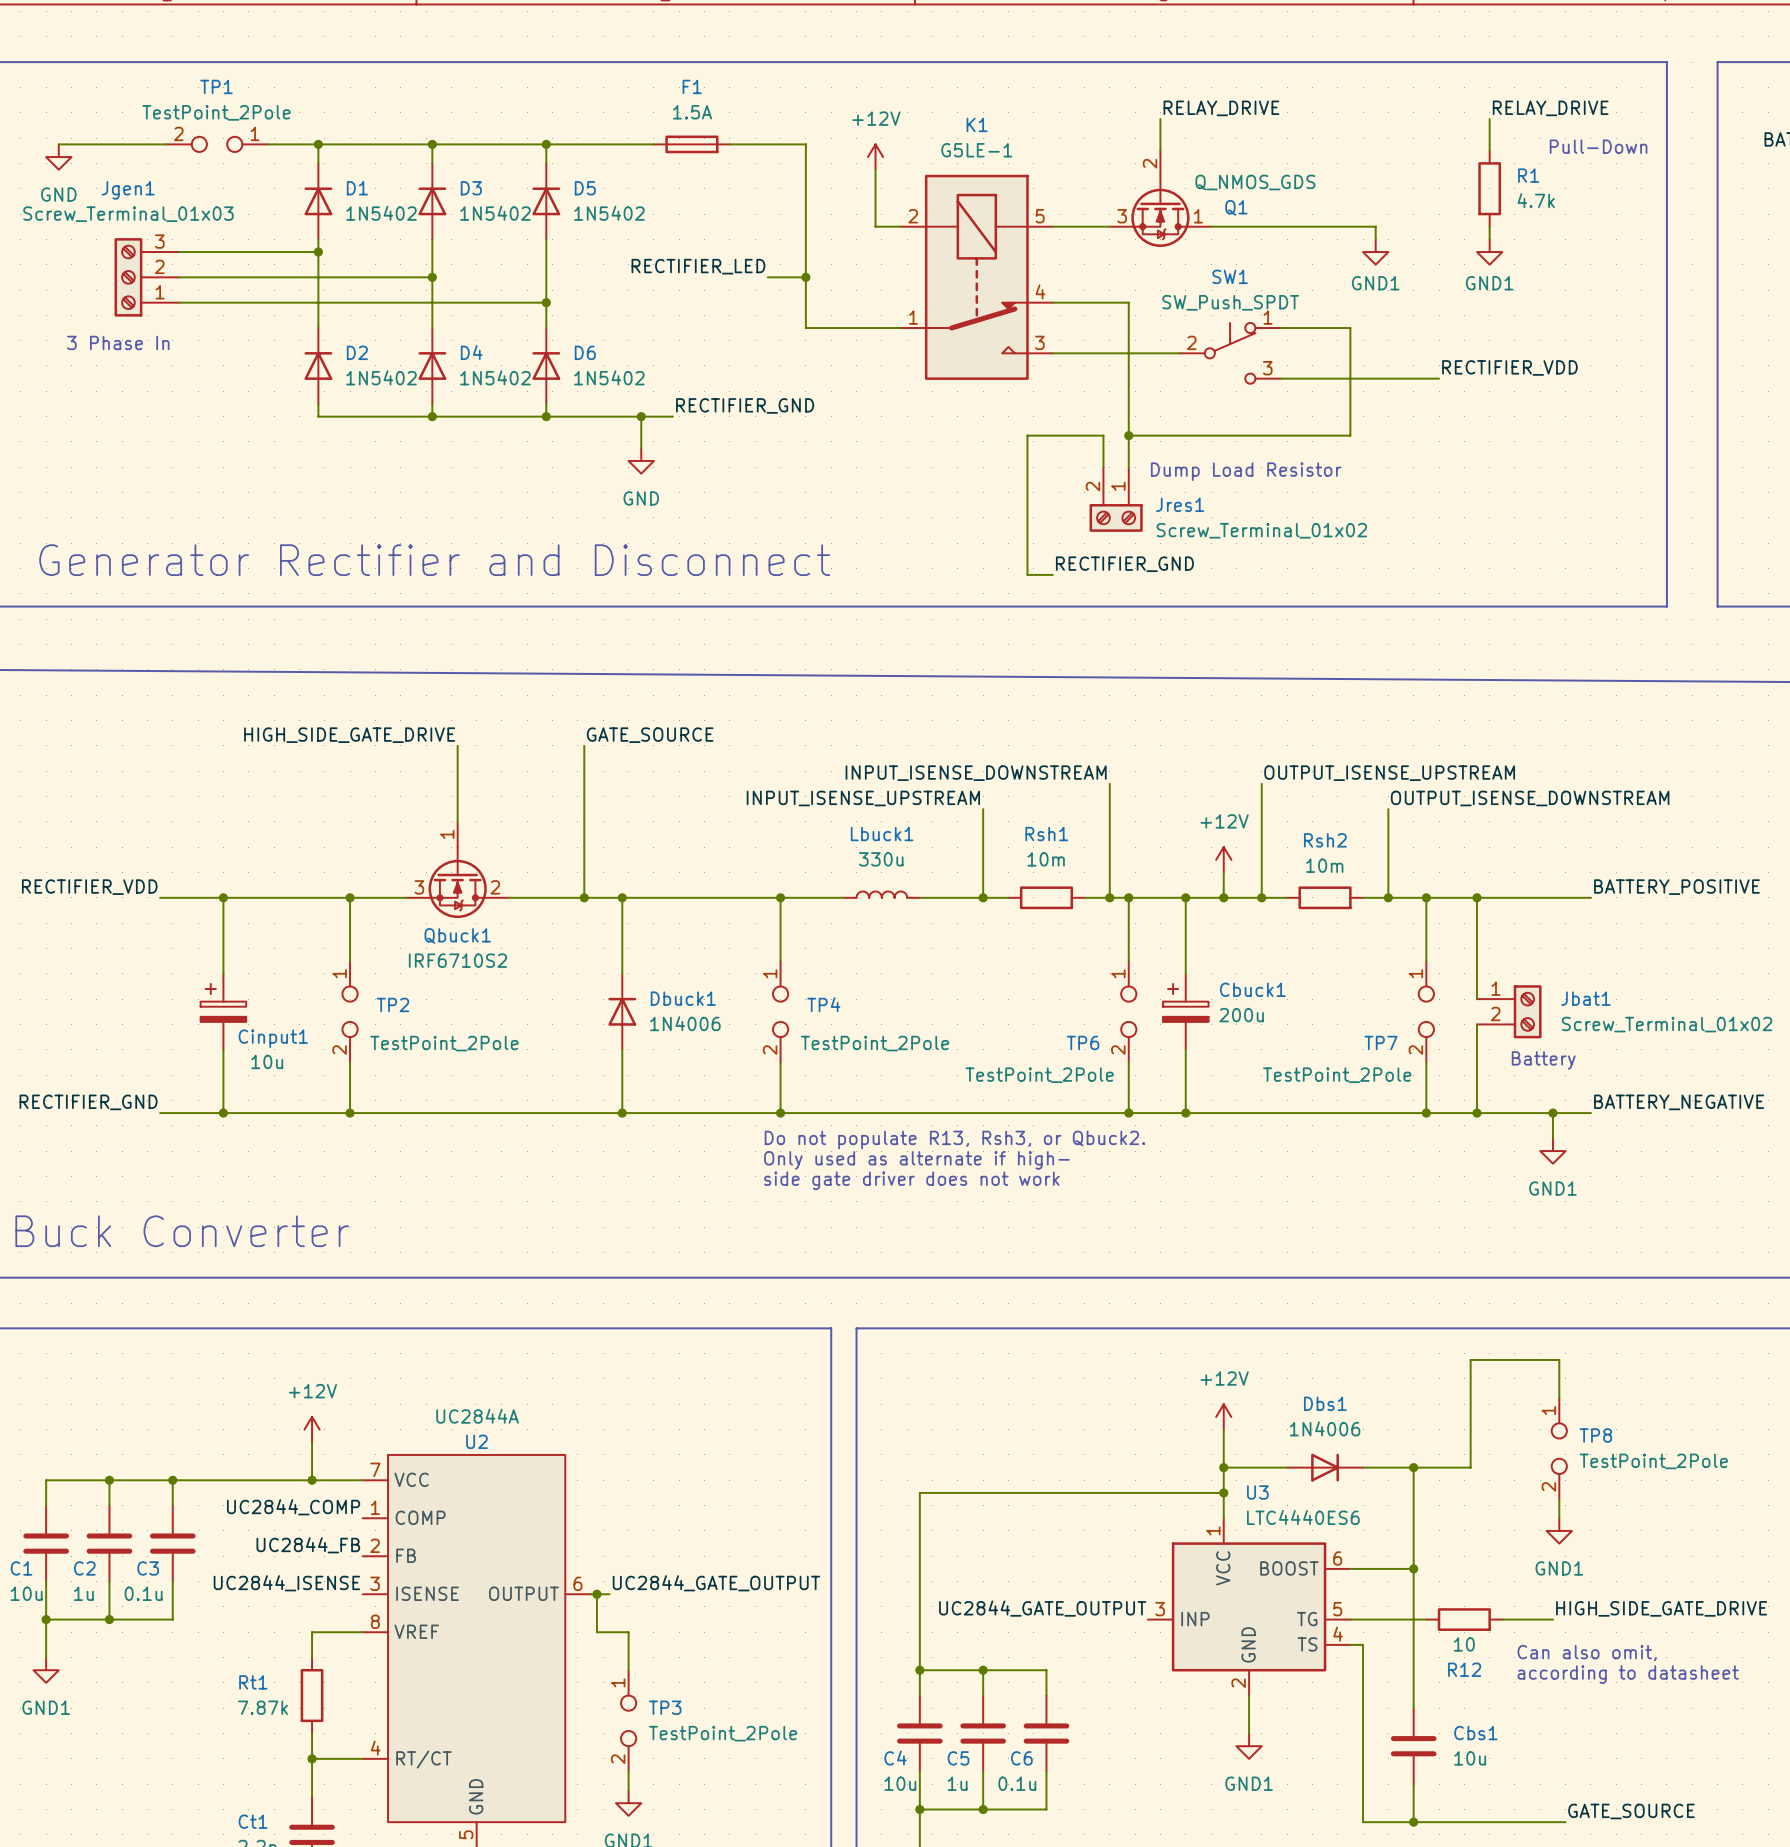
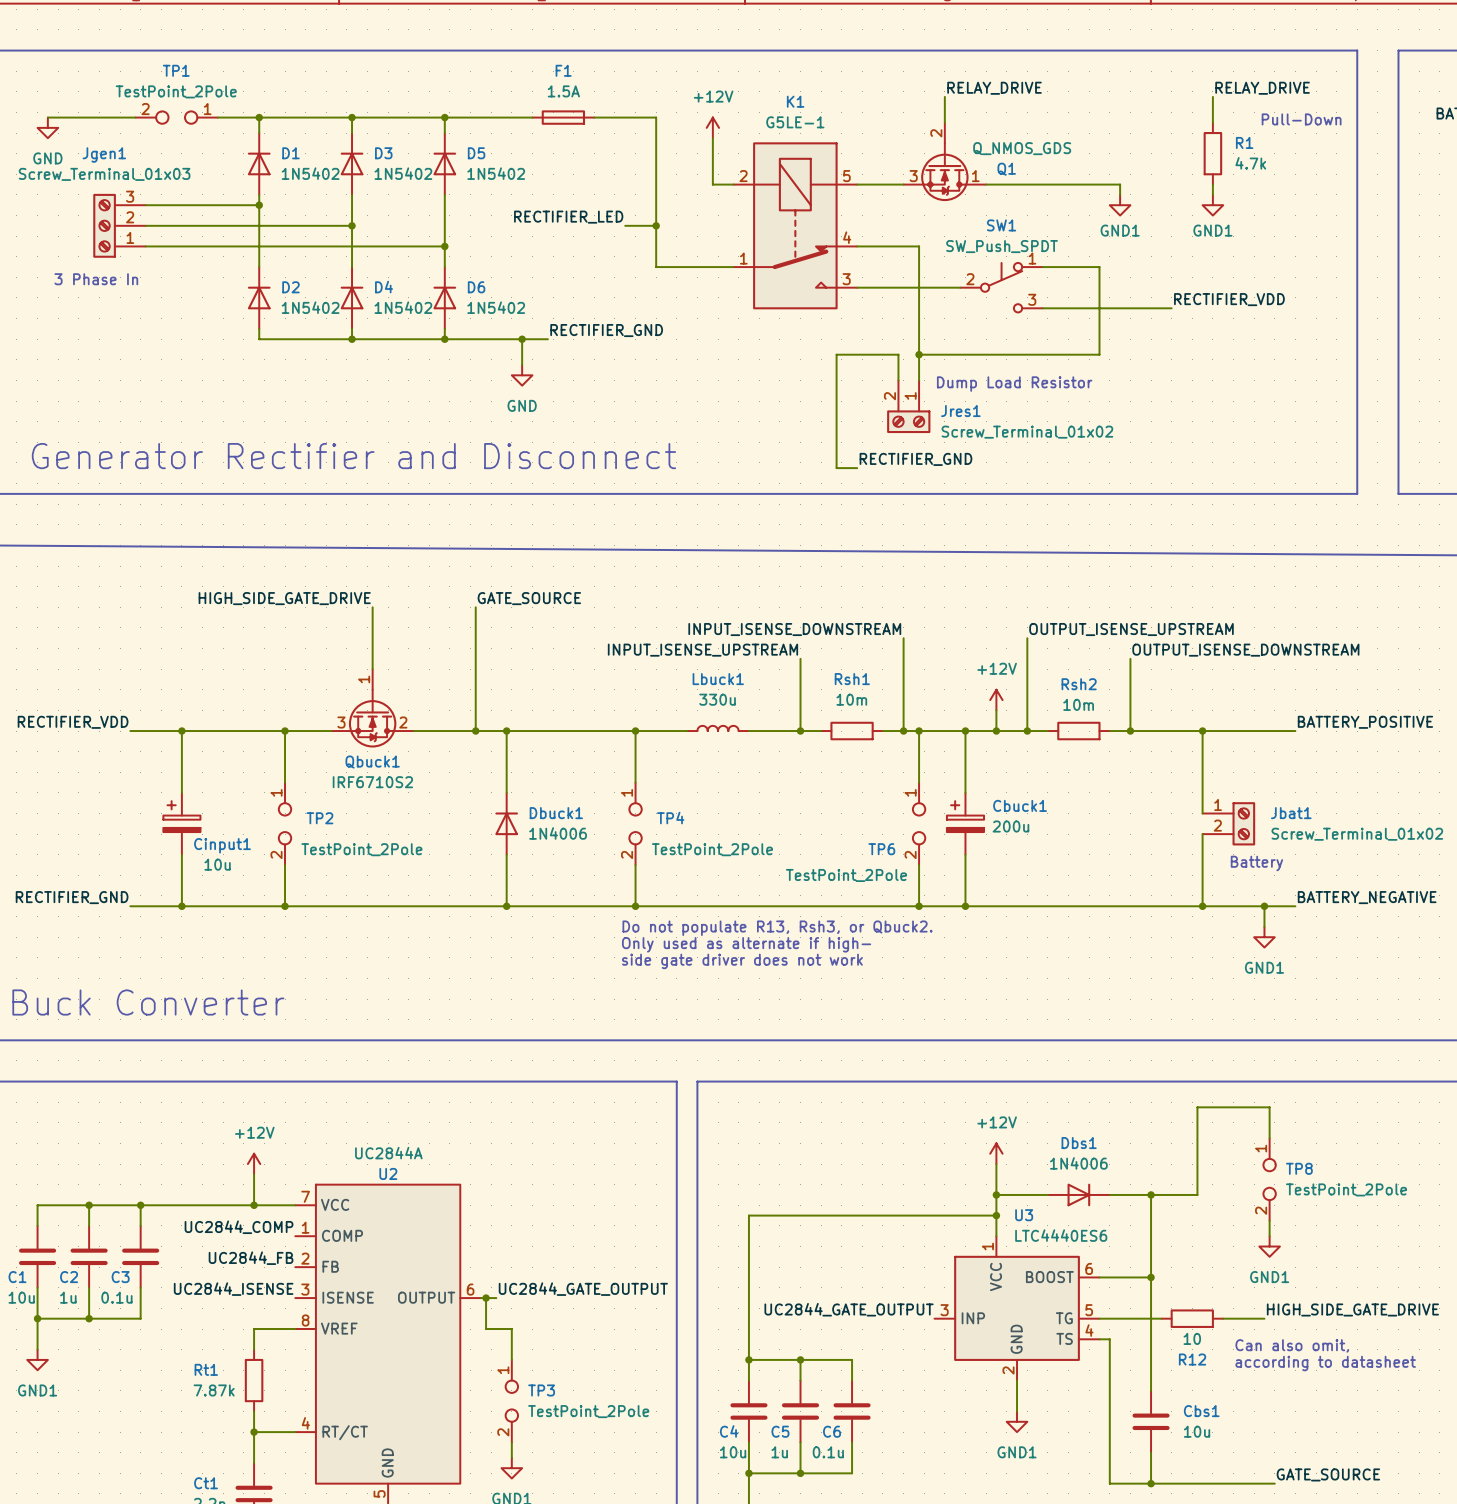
wire: (1426, 897) (1426, 961) -> none
junction: (1426, 897) -> none
TP7: TestPoint_2Pole (1426, 1011) -> none
wire: (1426, 1062) (1426, 1113) -> none
junction: (1426, 1113) -> none

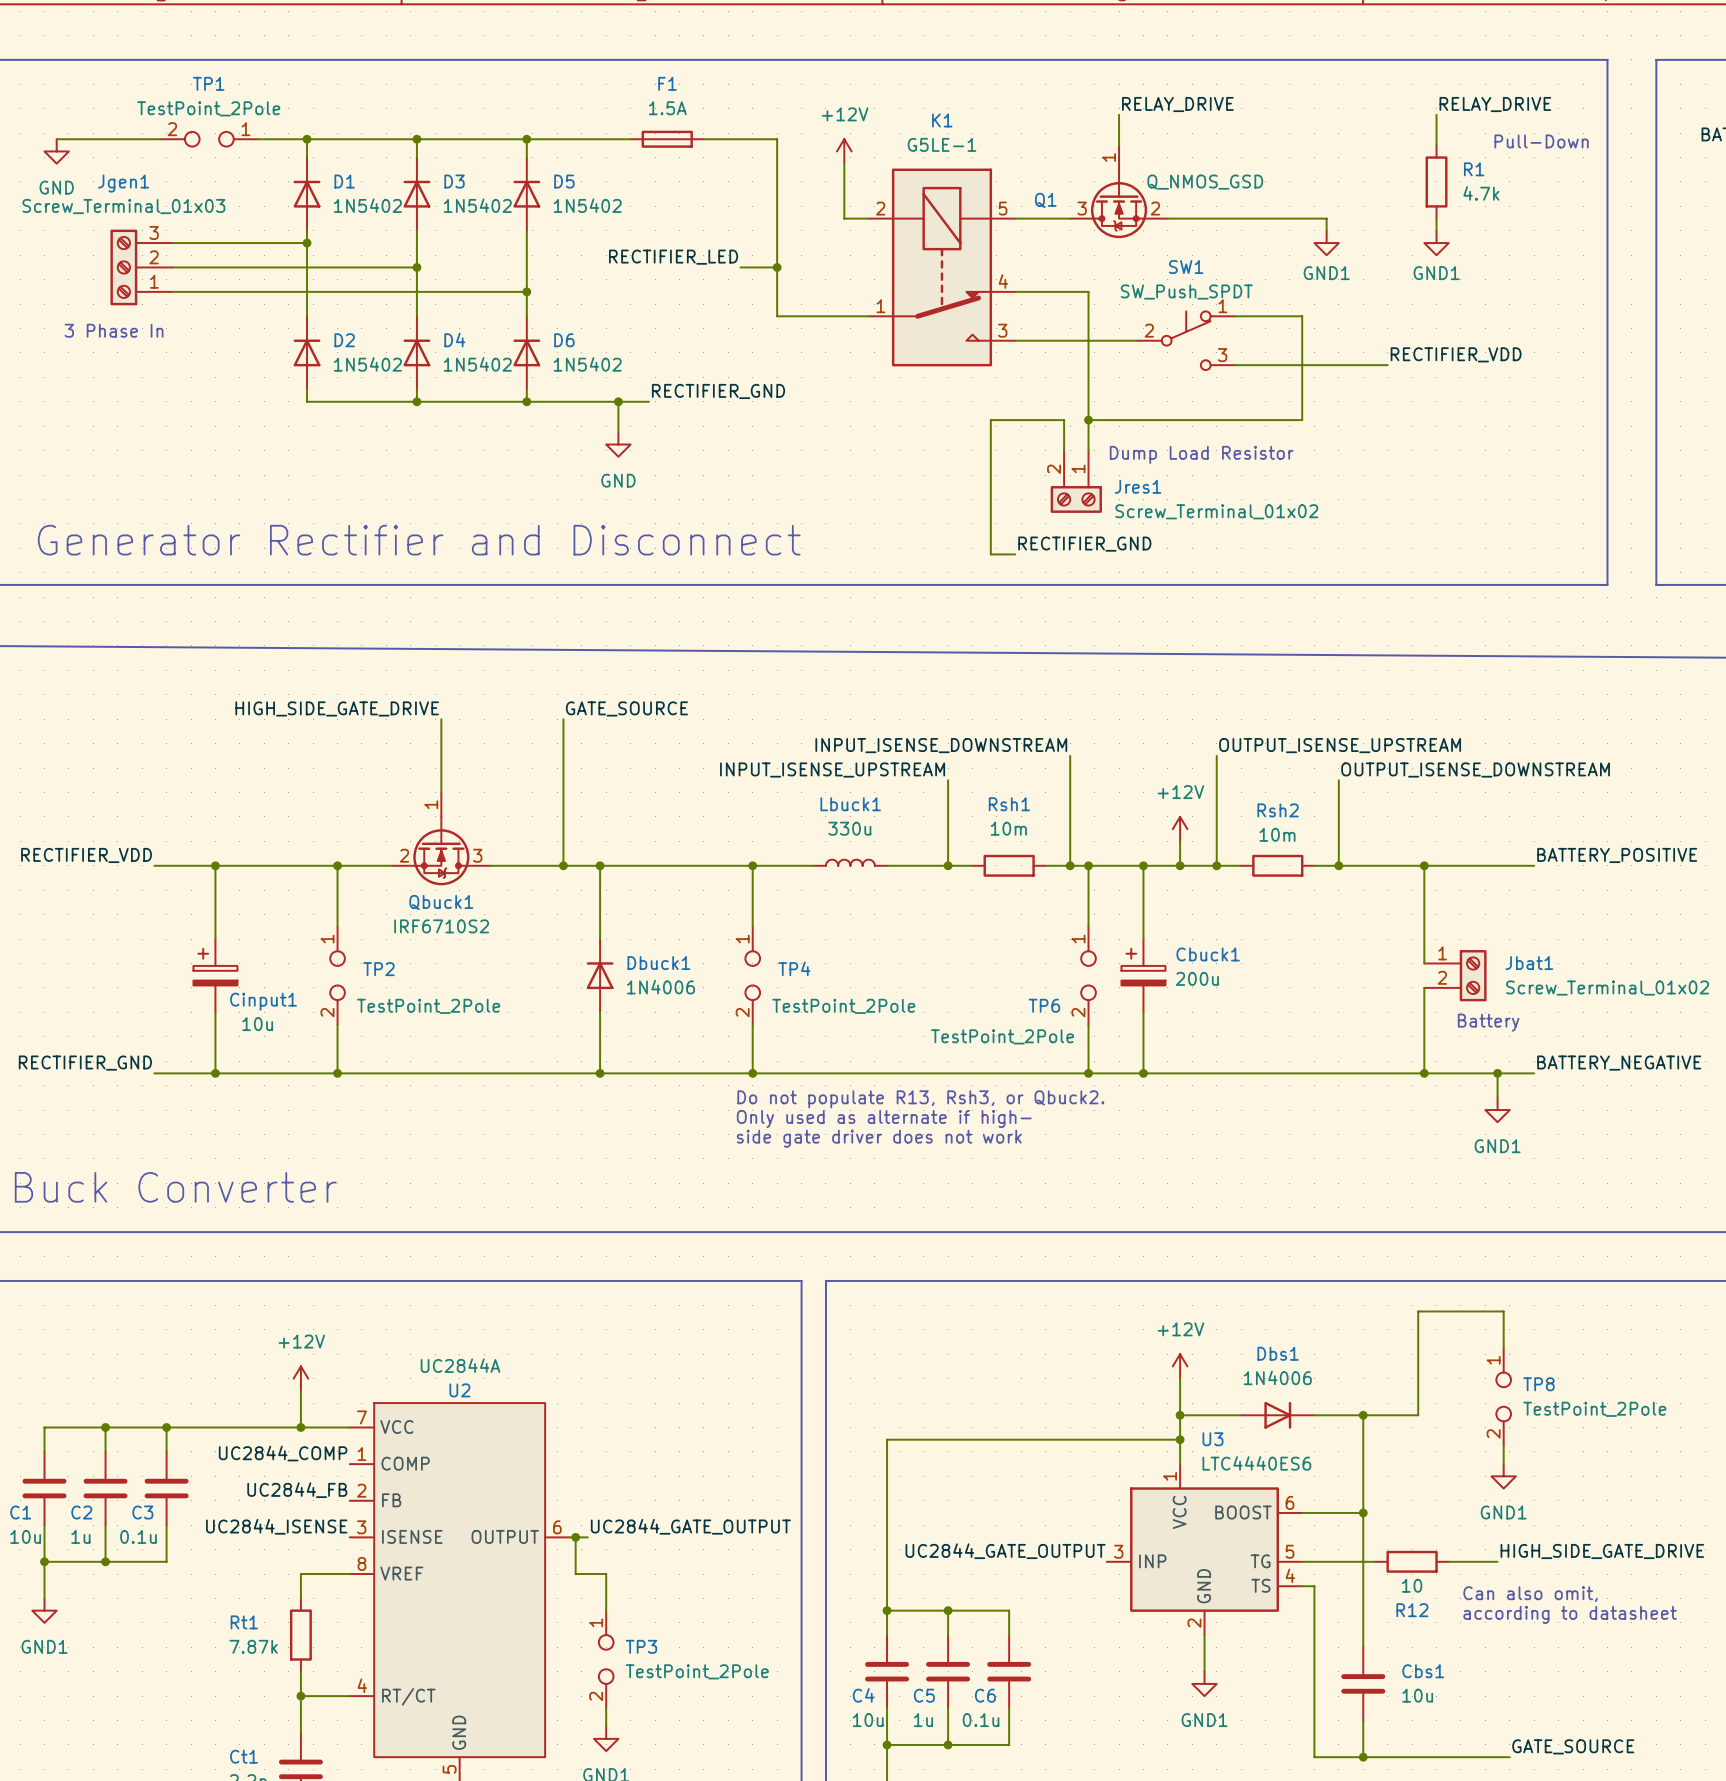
Q1 symbol: [903, 122, 987, 202] -> [1070, 145, 1168, 239]
Q1 value: Q_NMOS_GDS (1022, 148) -> Q_NMOS_GSD (1205, 182)
Q1 name position: Q1 (1006, 169) -> Q1 (1045, 200)
Qbuck1 pin number: 3 (341, 722) -> 2 (404, 855)
Qbuck1 pin number: 2 (403, 722) -> 3 (477, 855)

